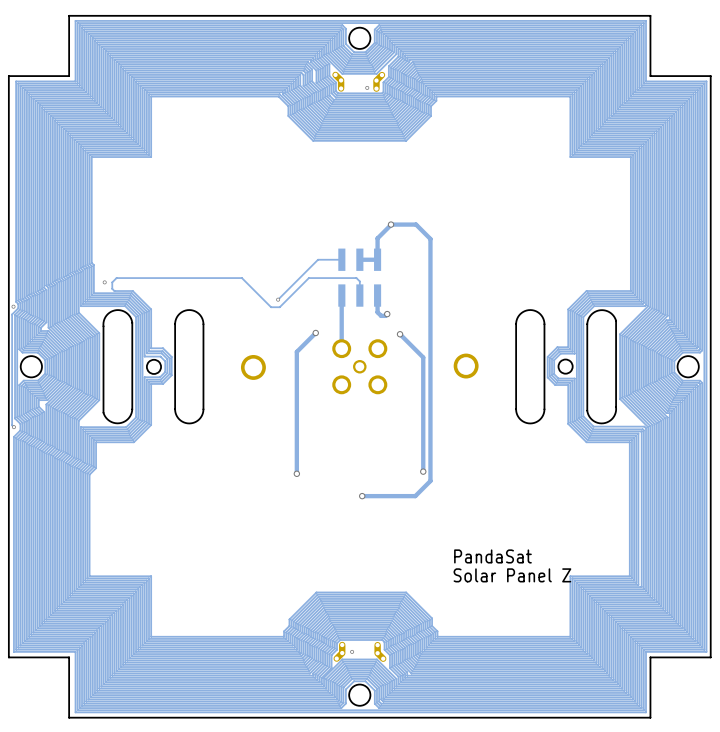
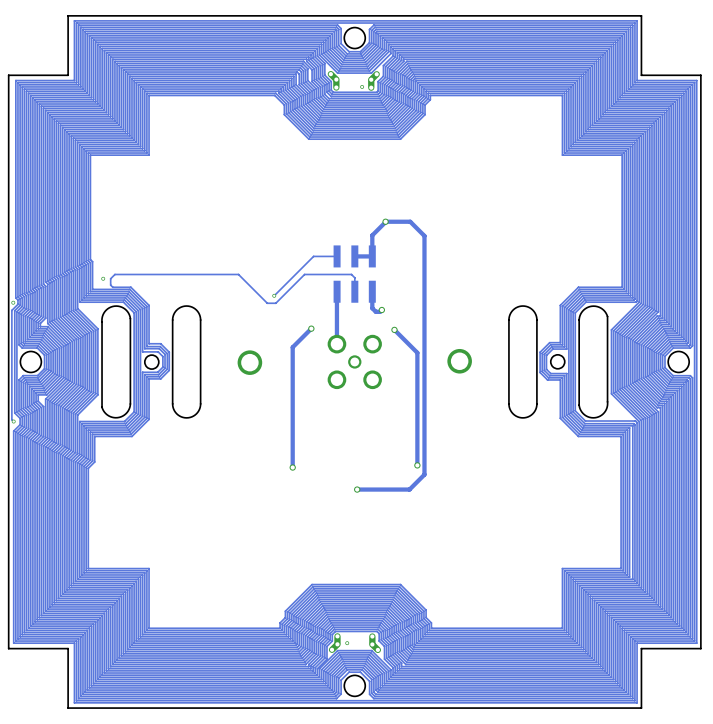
text: PandaSat (492, 556) -> none
text: Solar Panel Z (512, 575) -> none

